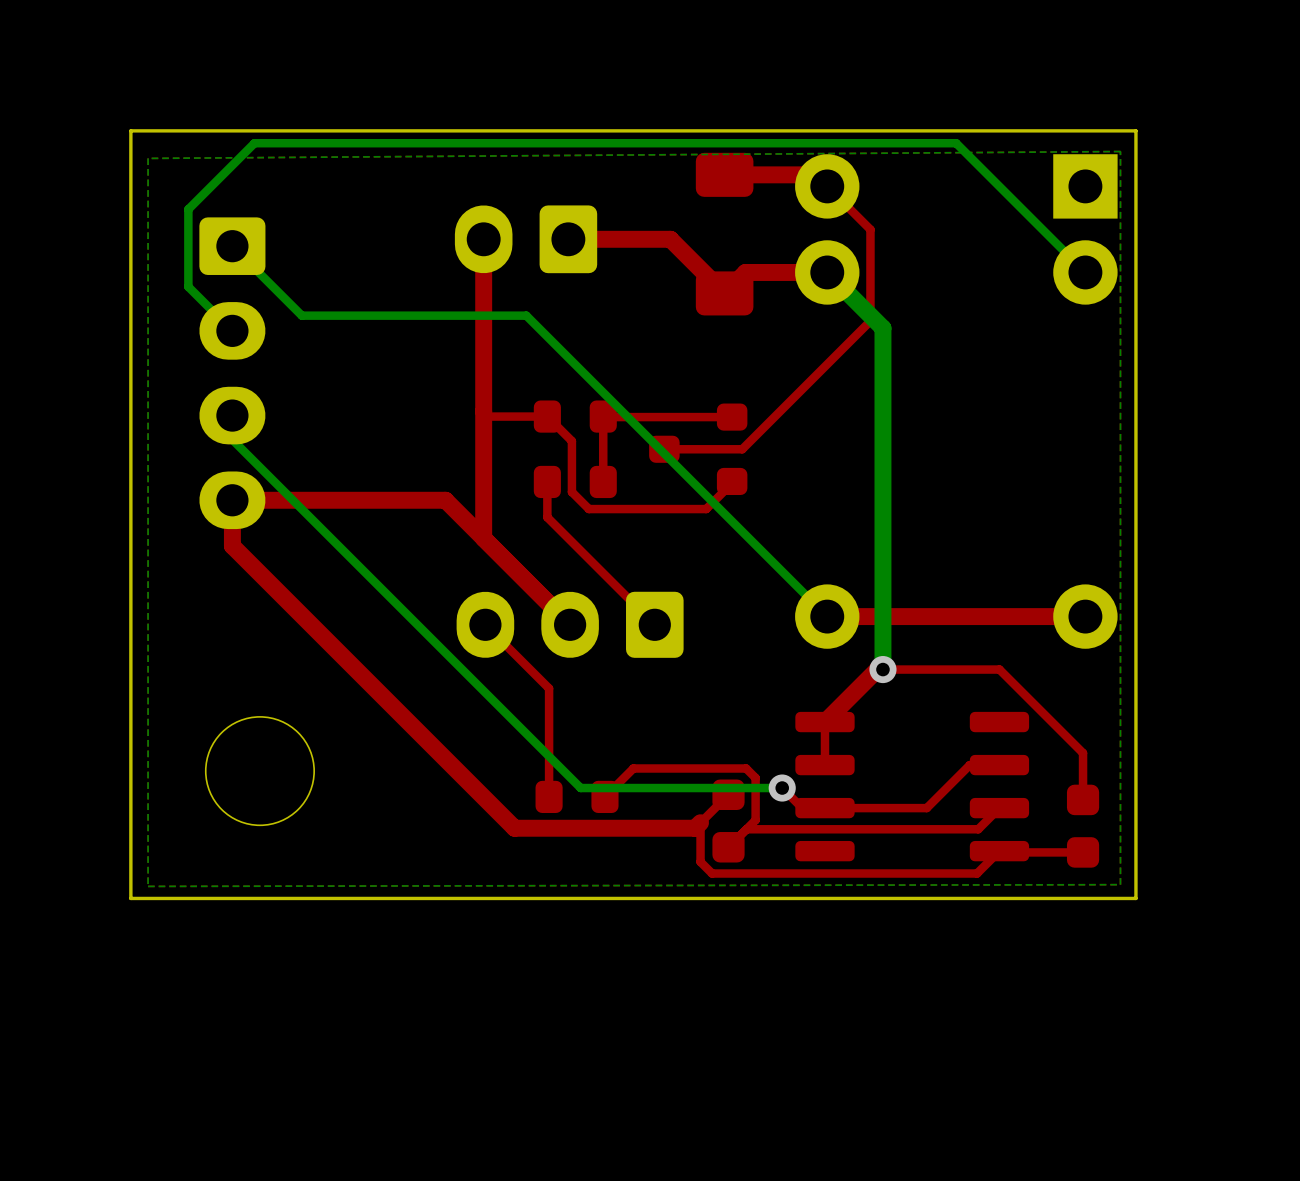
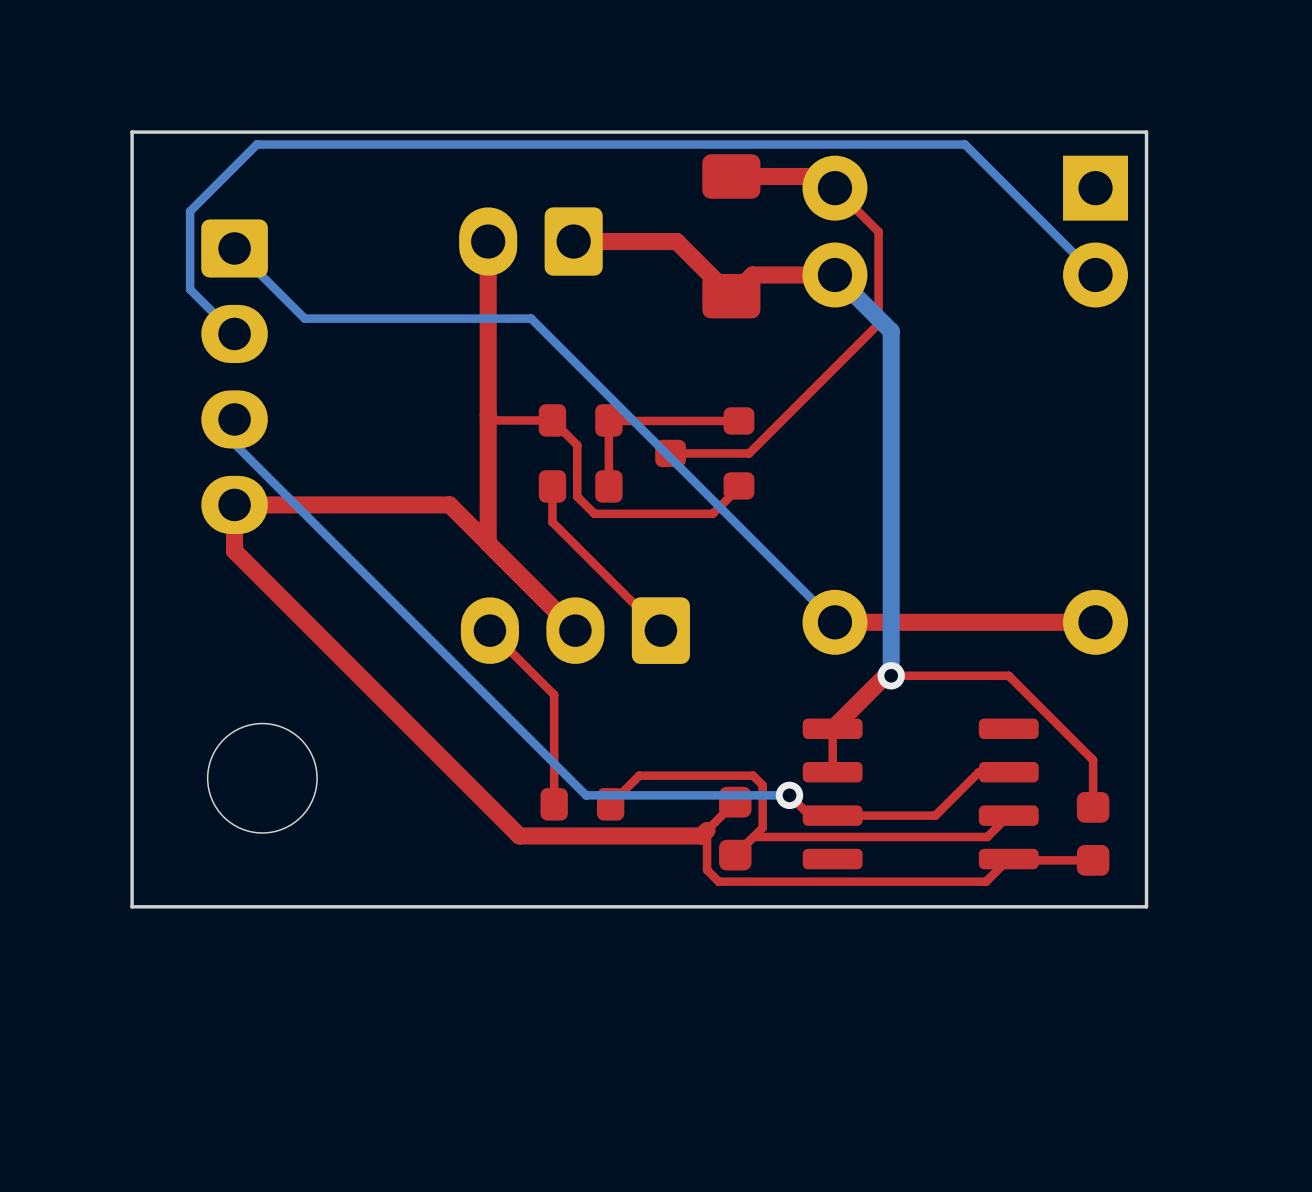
bottom zone outline: (1120, 151) (148, 158) (148, 886) (1120, 884) (1120, 151) -> none

